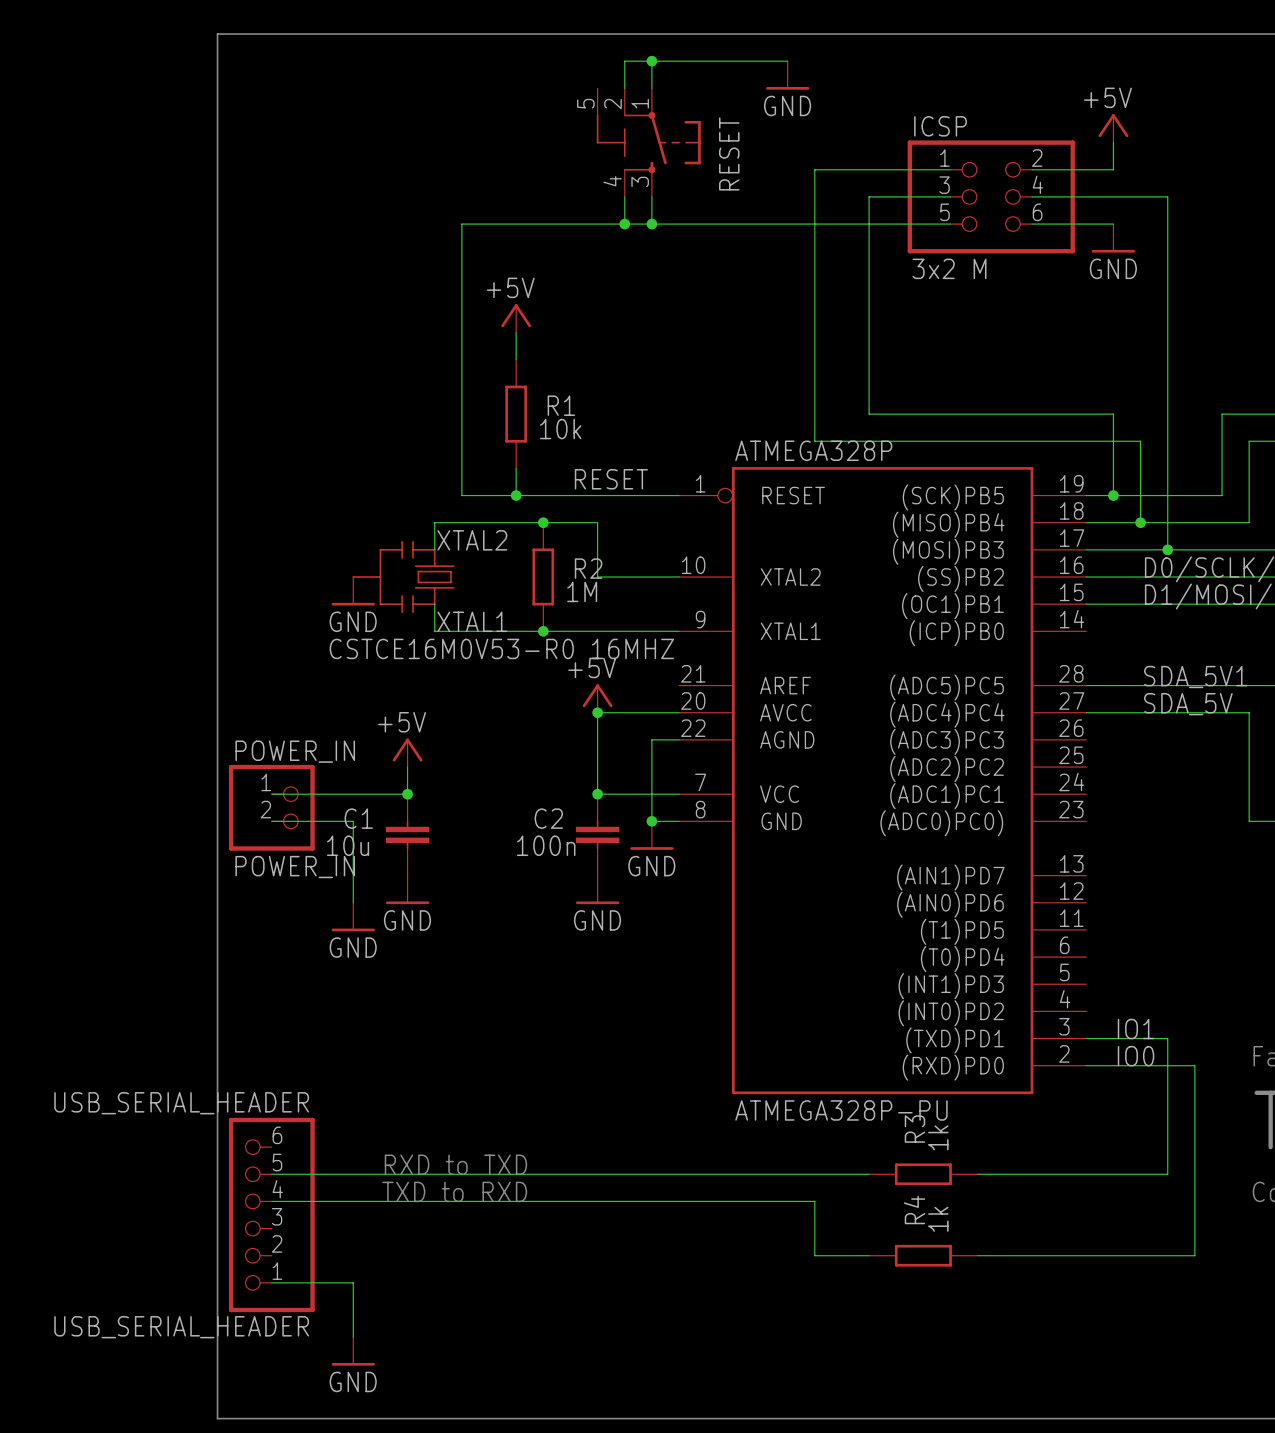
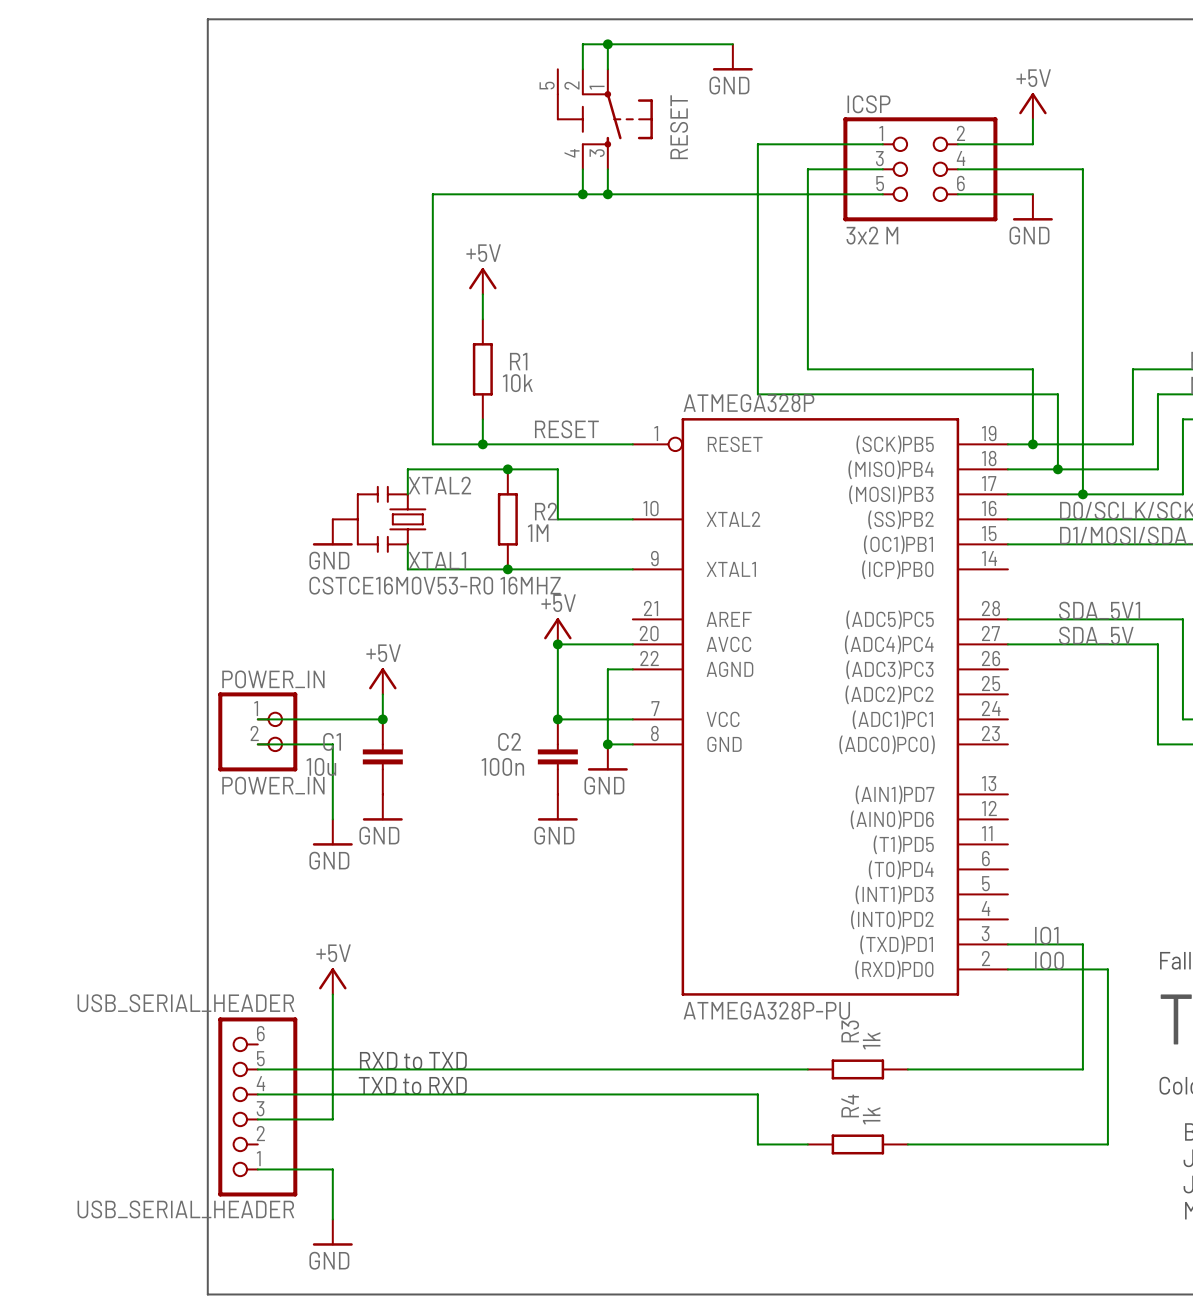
power symbol: none -> +5V (332, 981)
wire: none -> (332, 994) (332, 1119) (257, 1119)

